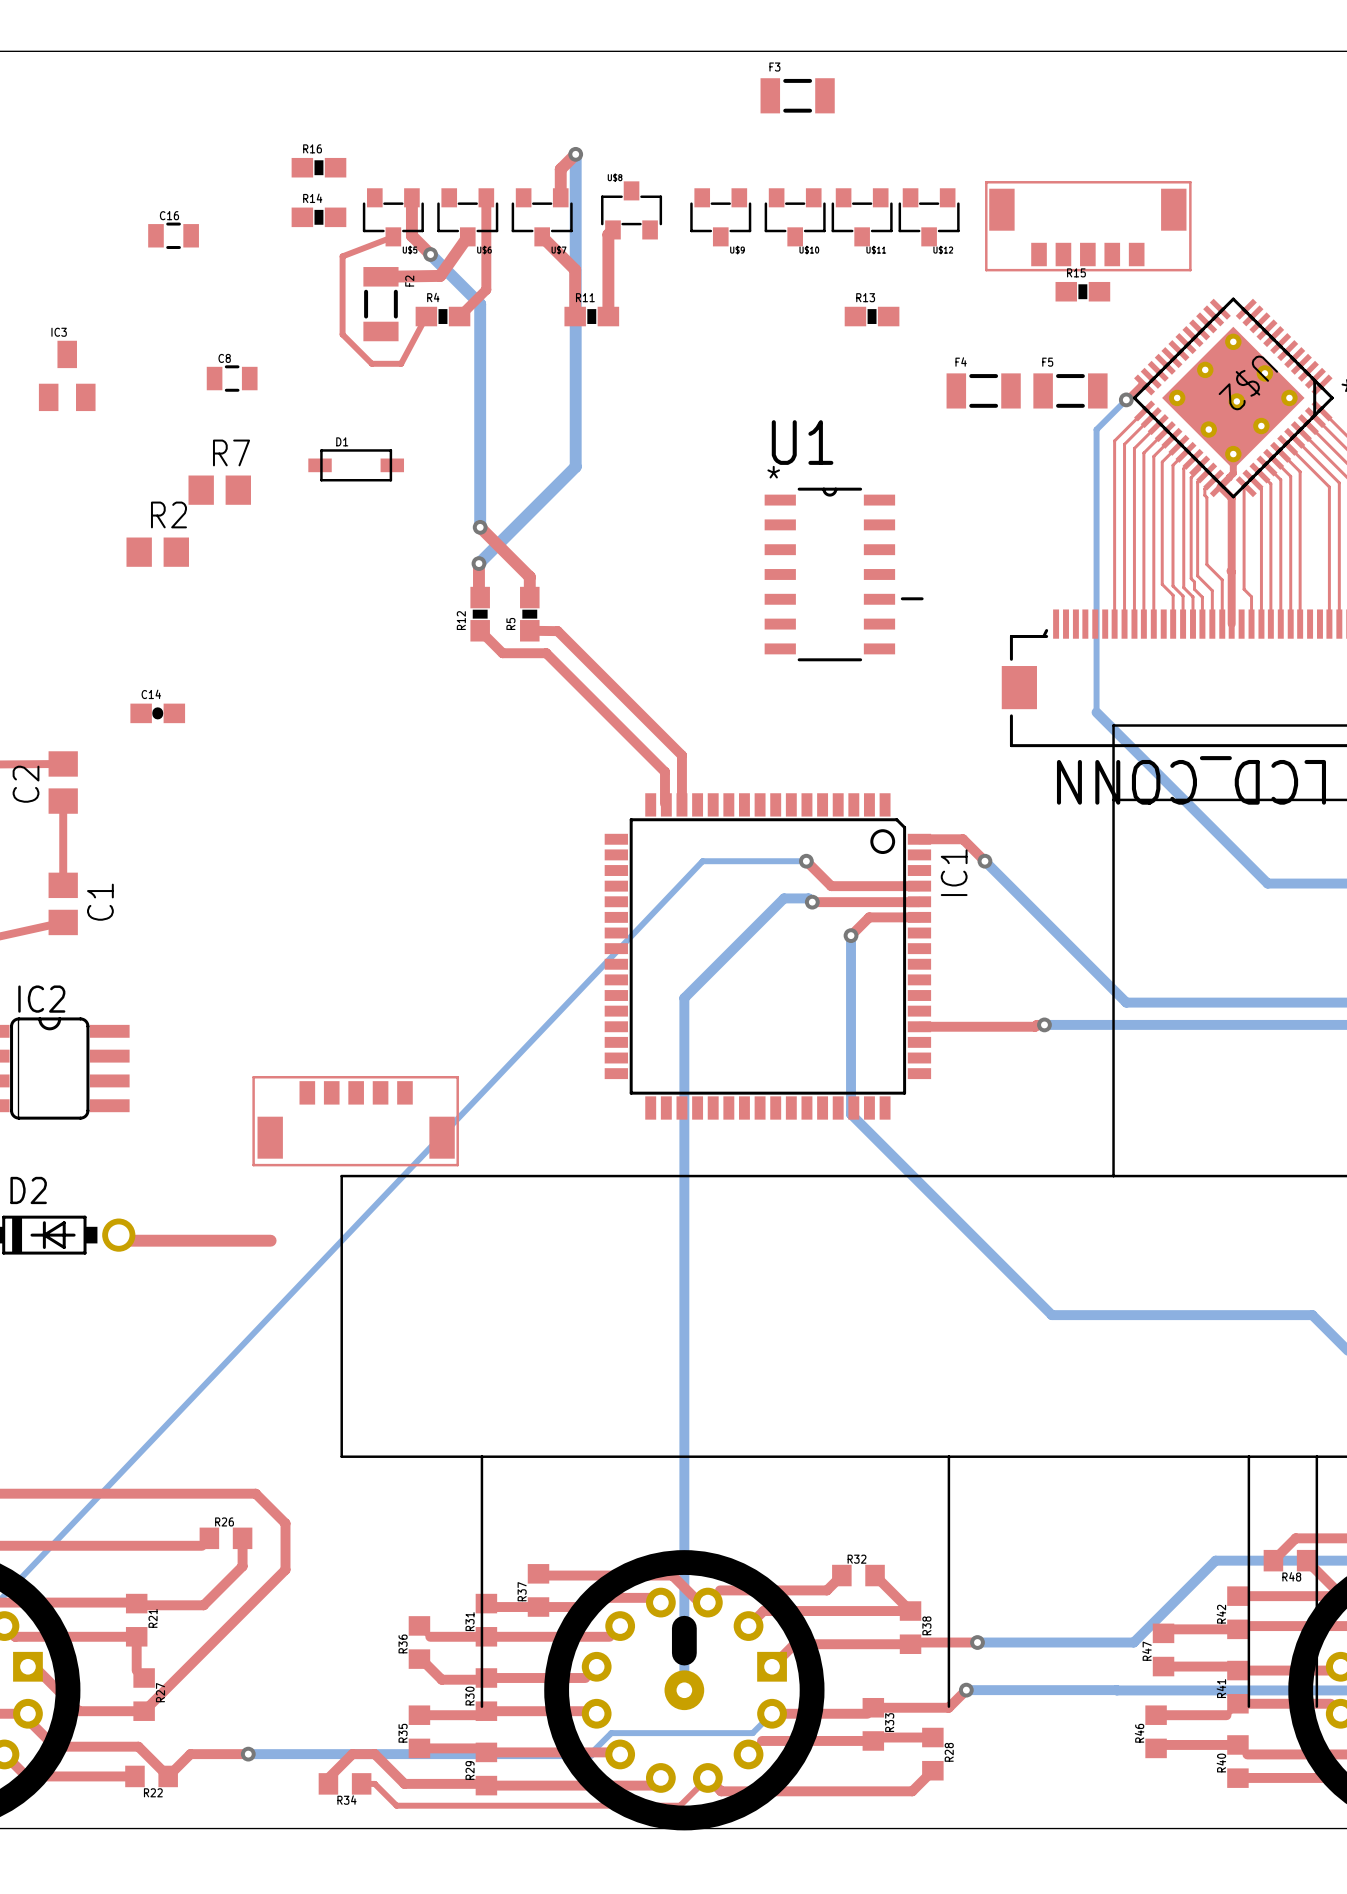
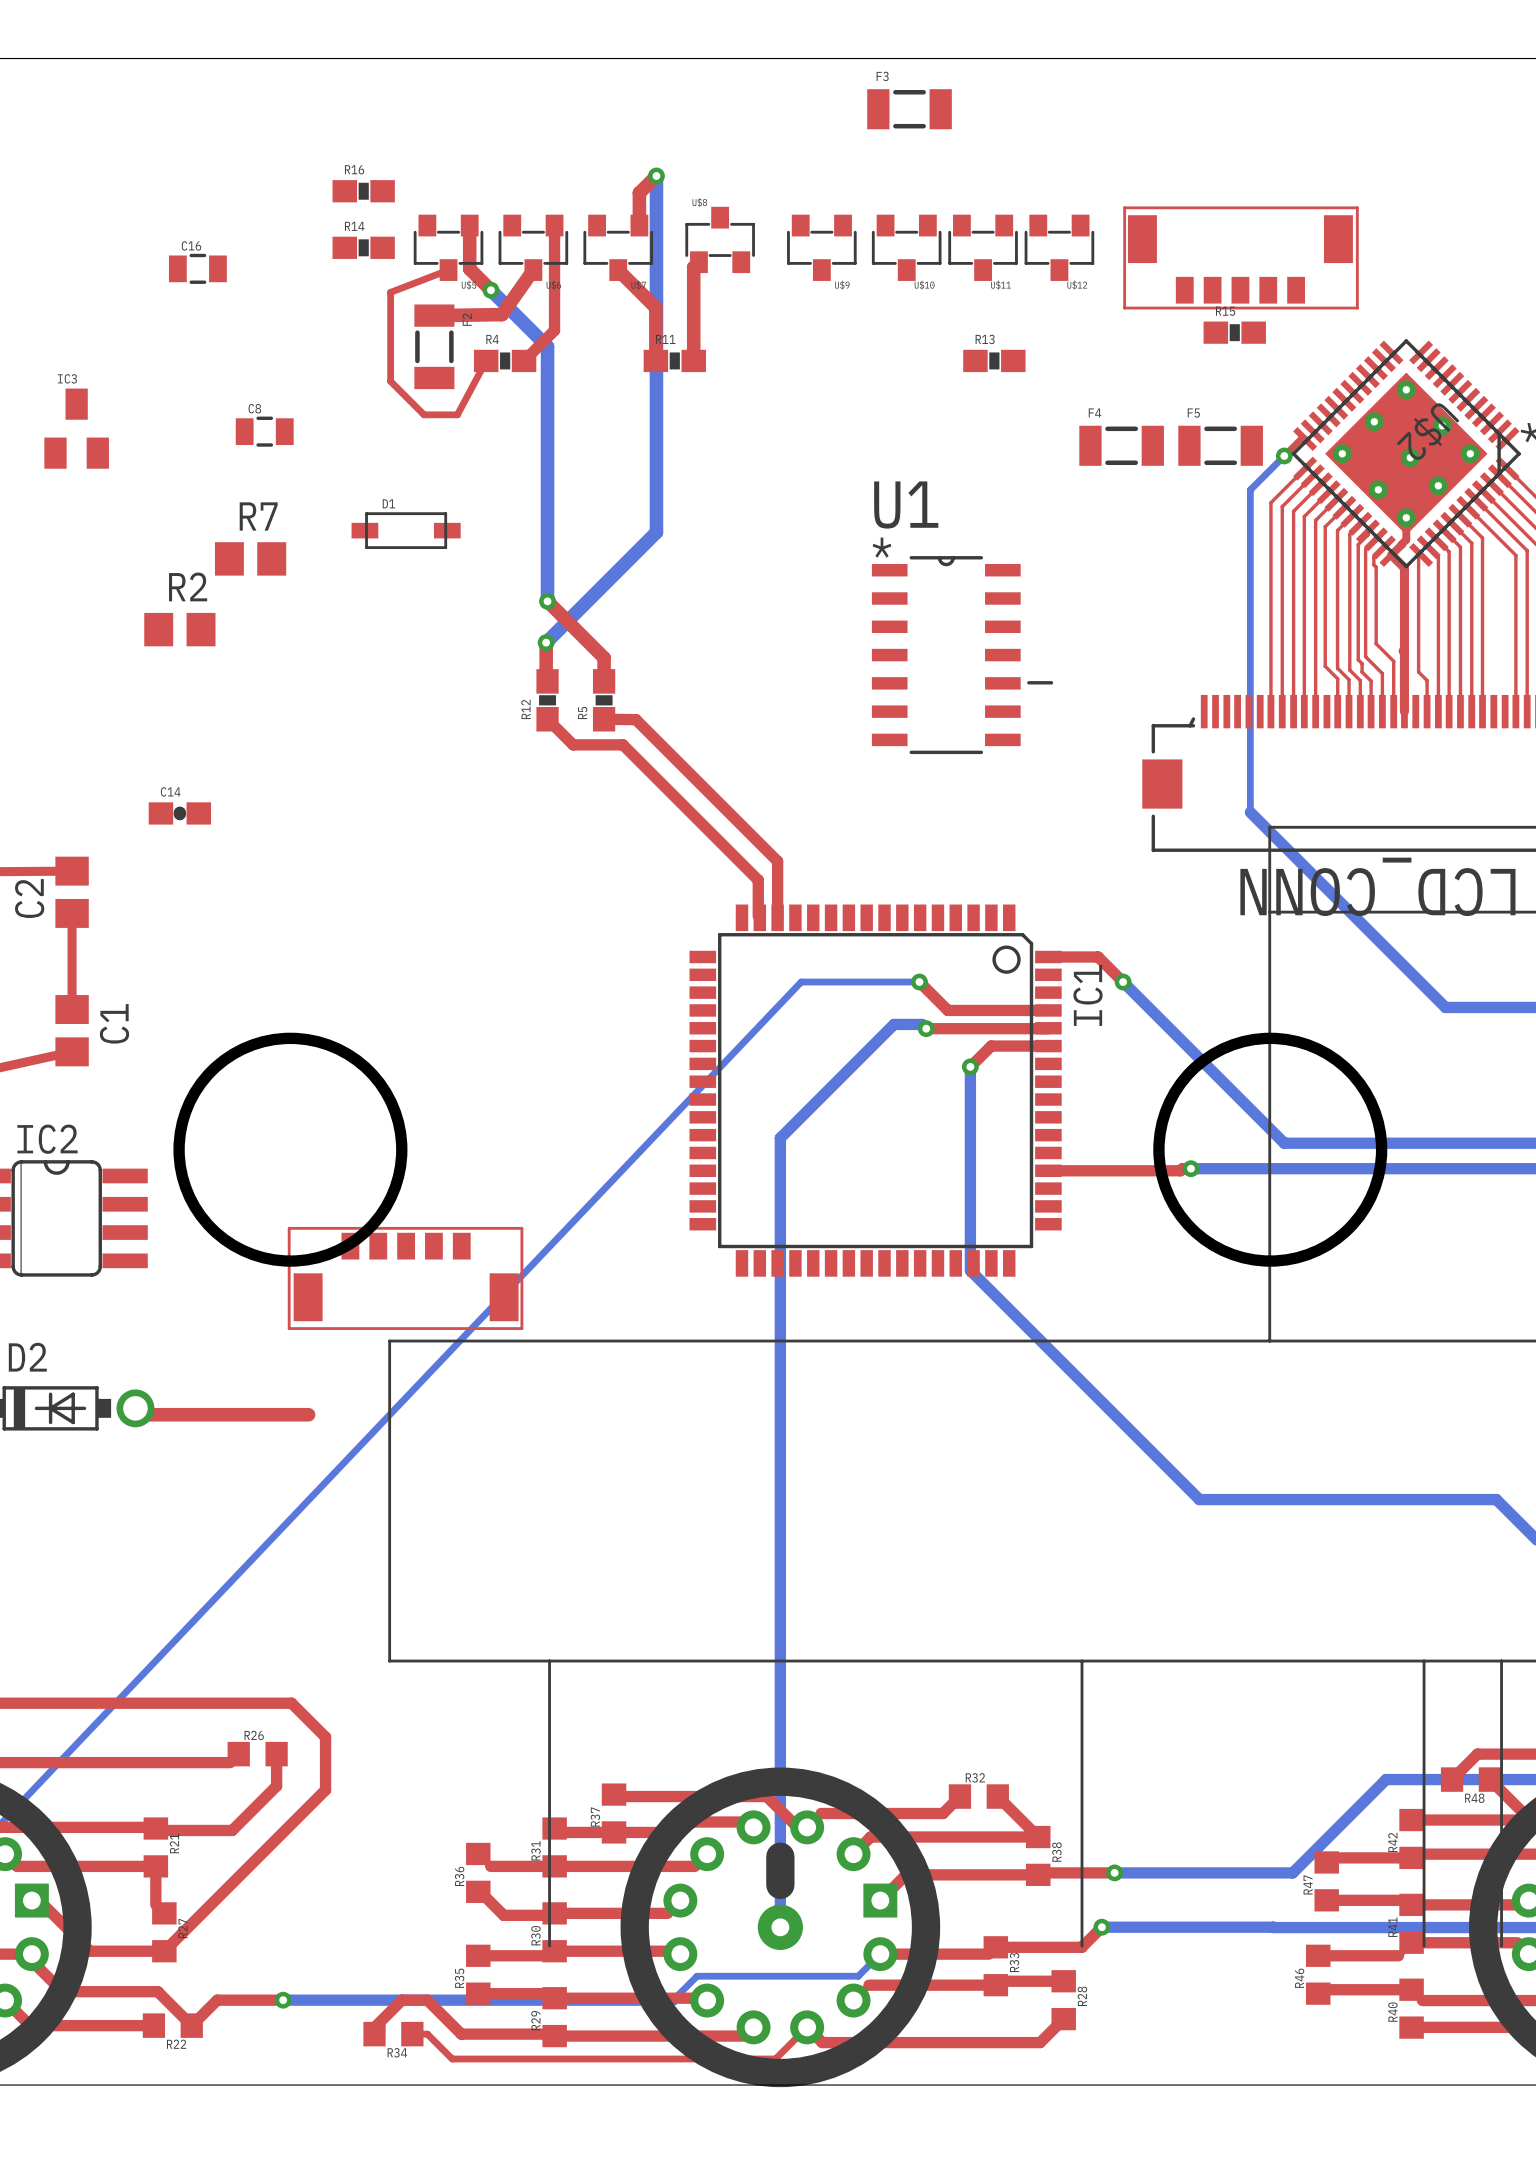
round board edge: none -> [173, 1032, 408, 1267]
round board edge: none -> [1153, 1032, 1388, 1267]

